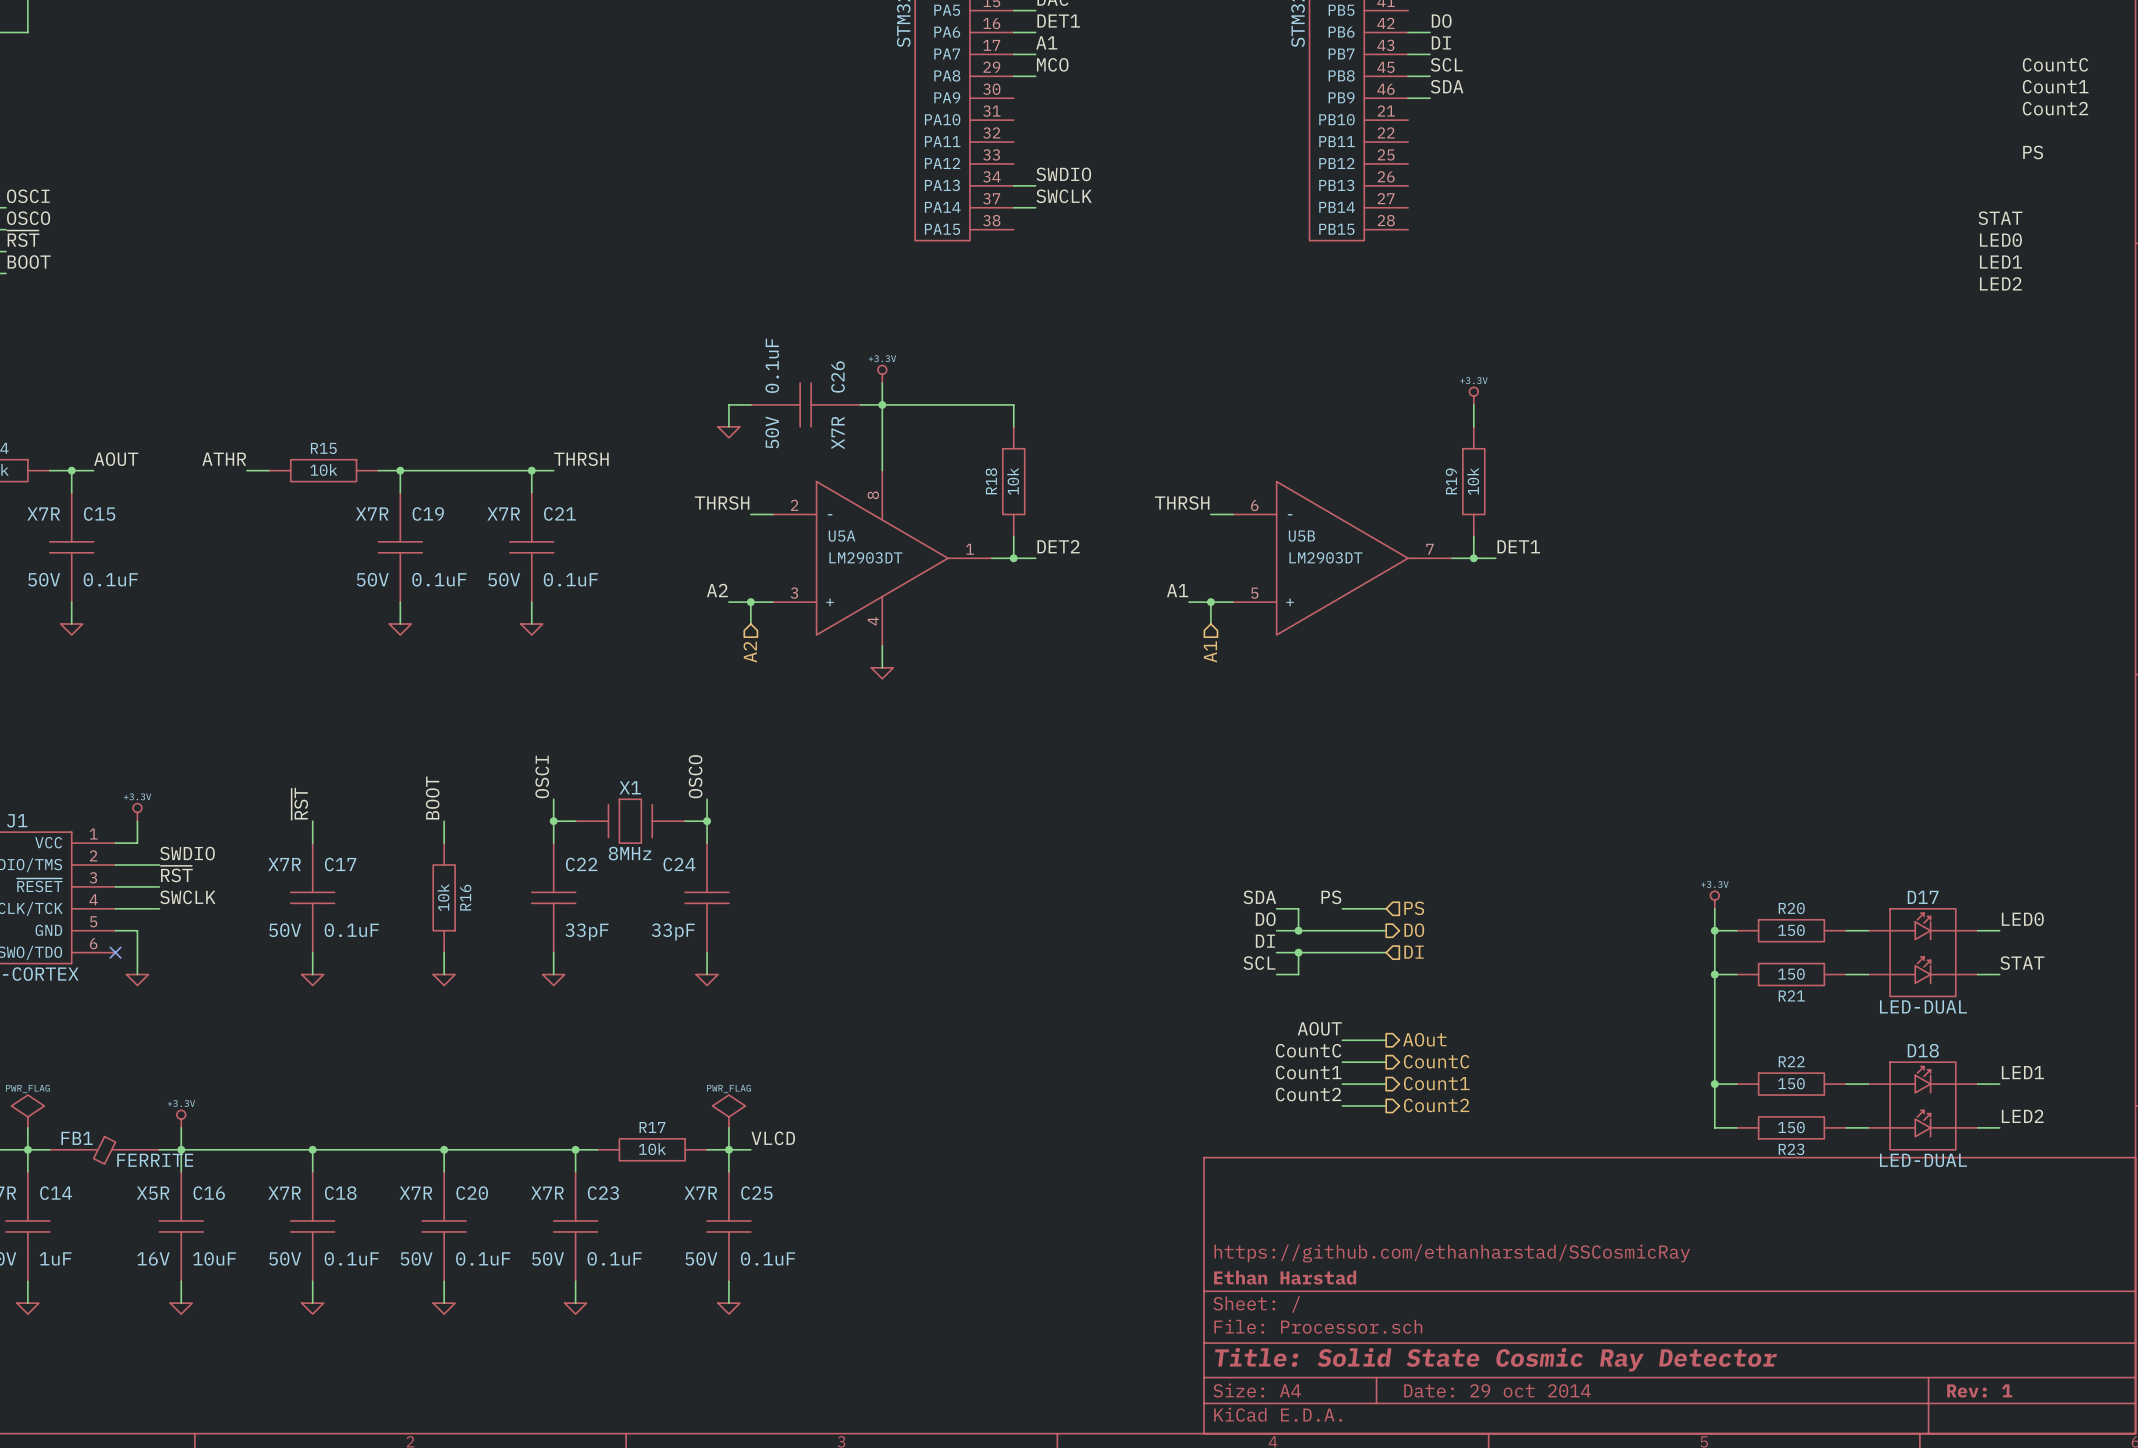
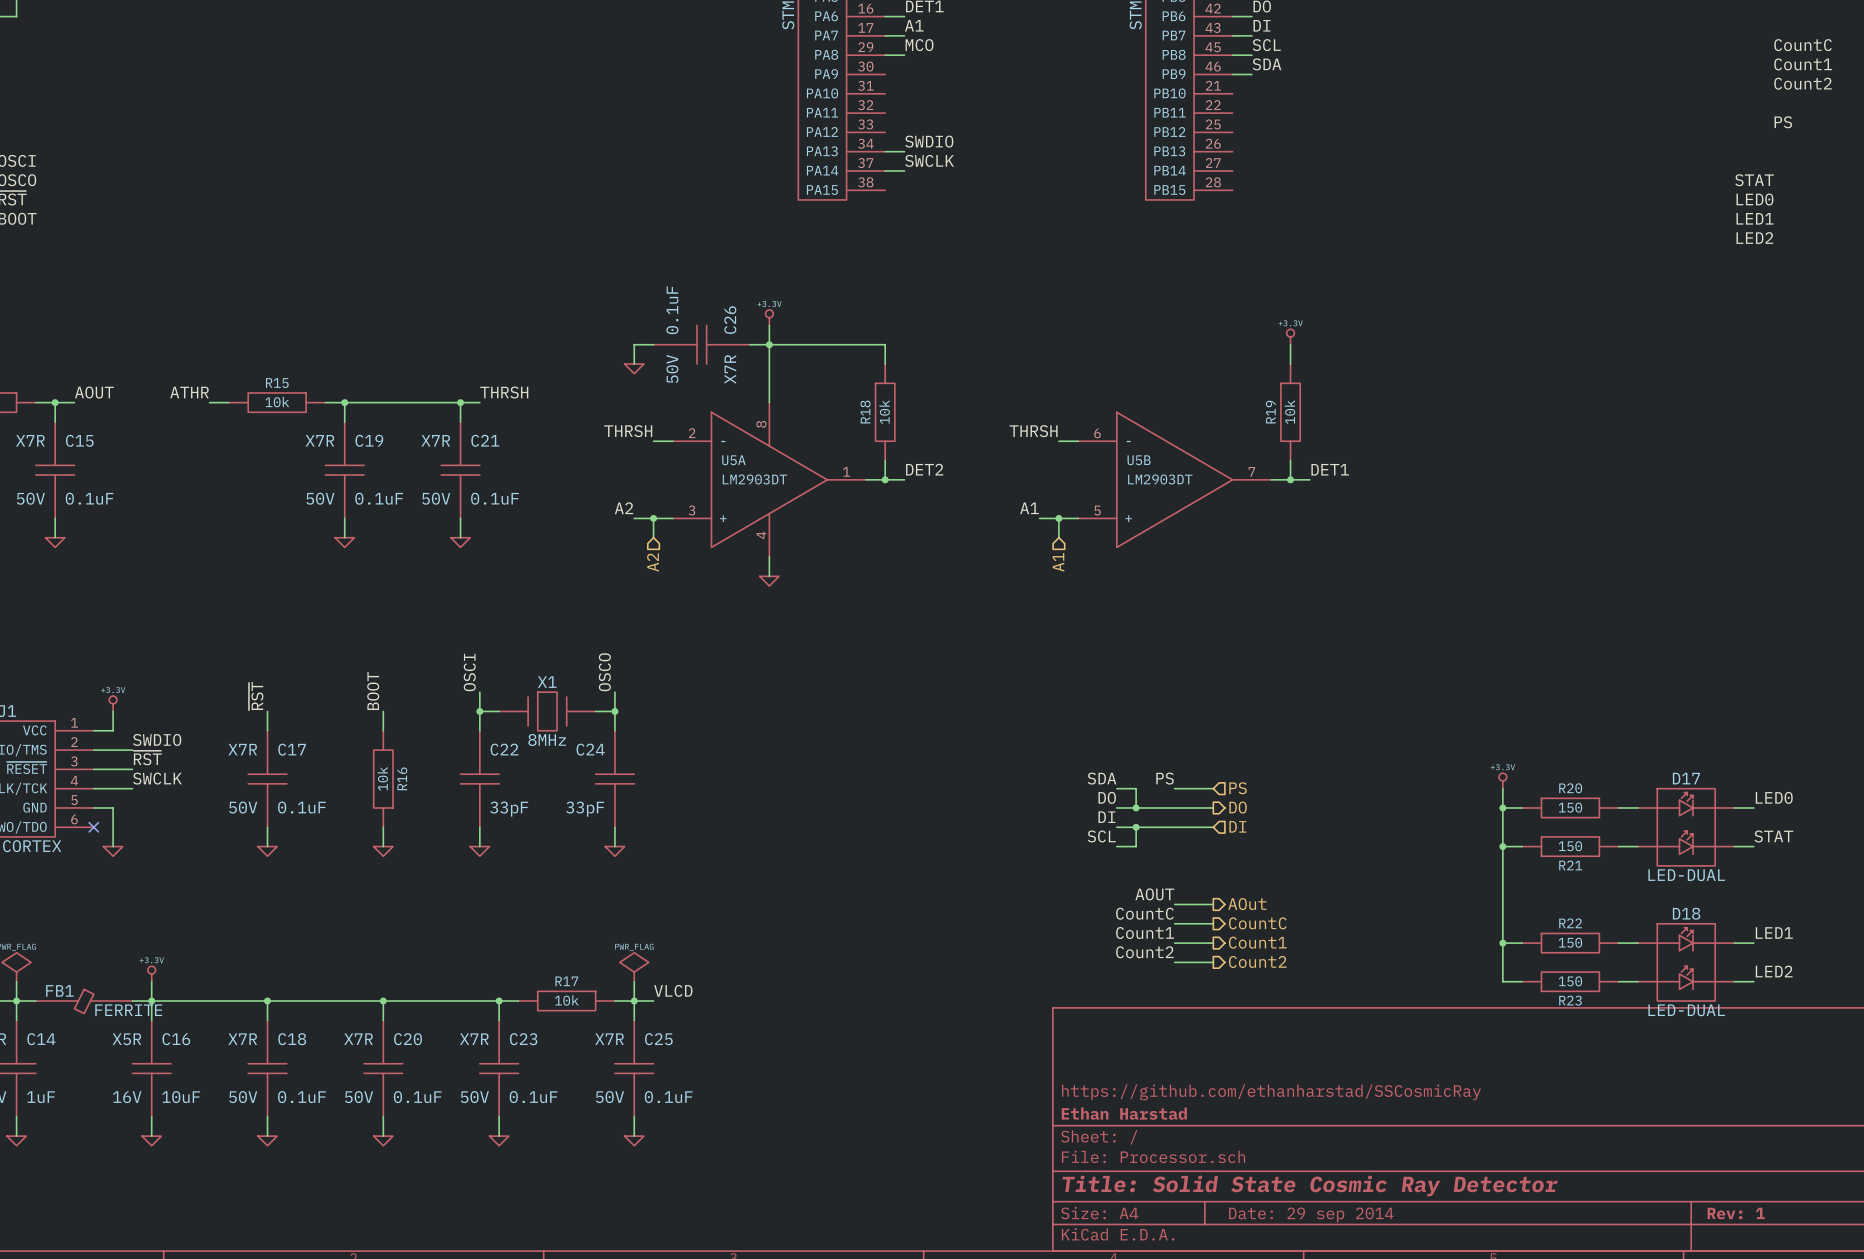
title block: Date: 29 oct 2014 (1497, 1390) -> Date: 29 sep 2014 (1311, 1214)

